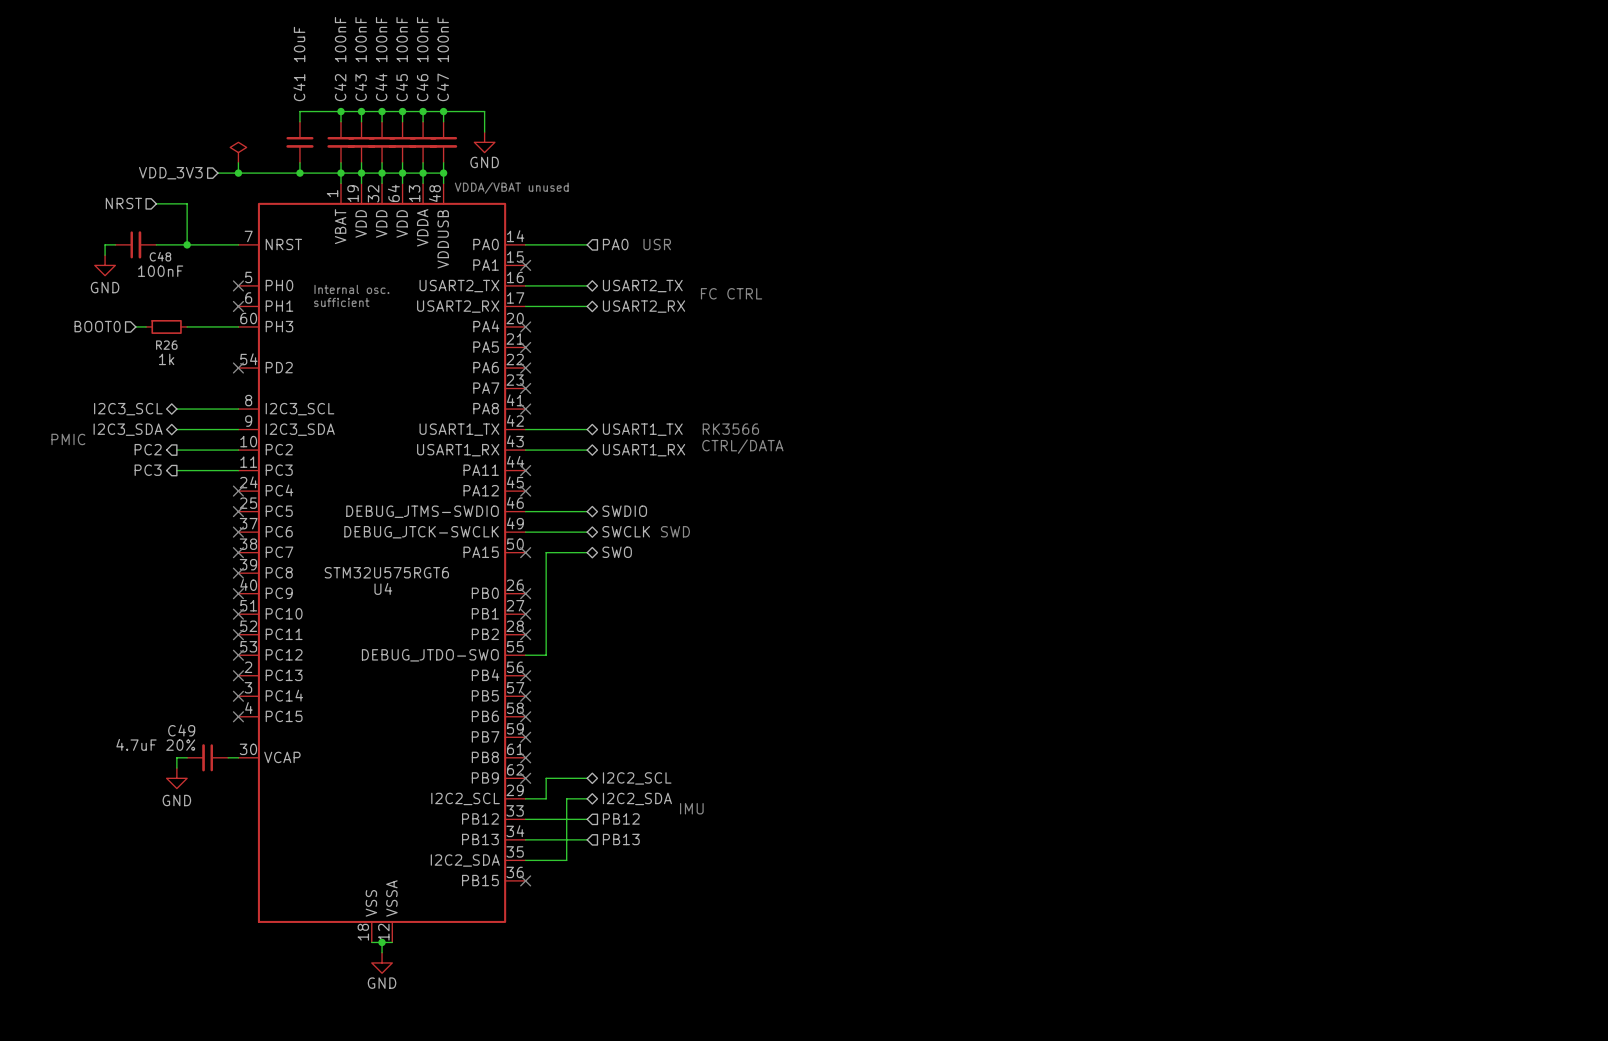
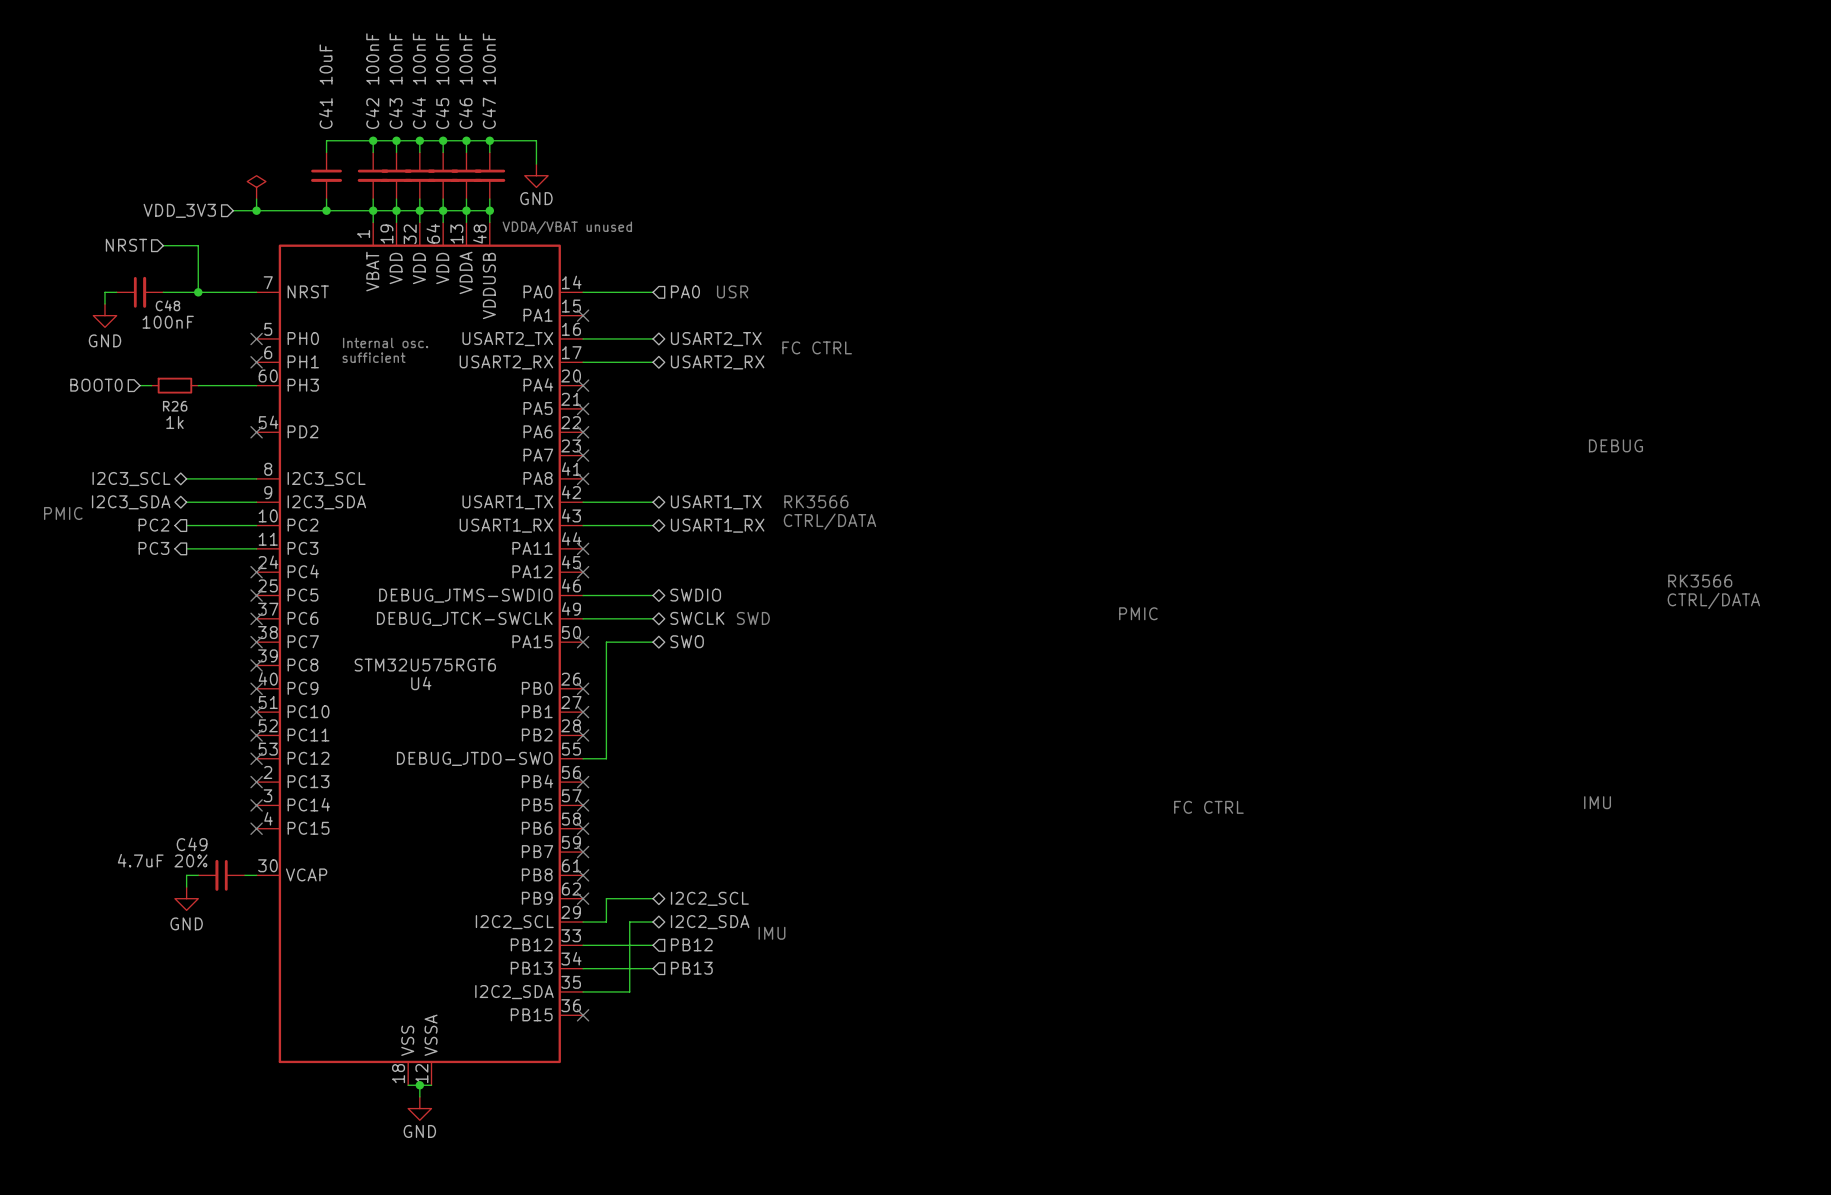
text: none -> DEBUG (1615, 445)
text: none -> RK3566 (1700, 581)
text: none -> CTRL/DATA (1713, 600)
text: none -> PMIC (1138, 613)
text: none -> IMU (1597, 802)
text: none -> FC CTRL (1208, 807)

